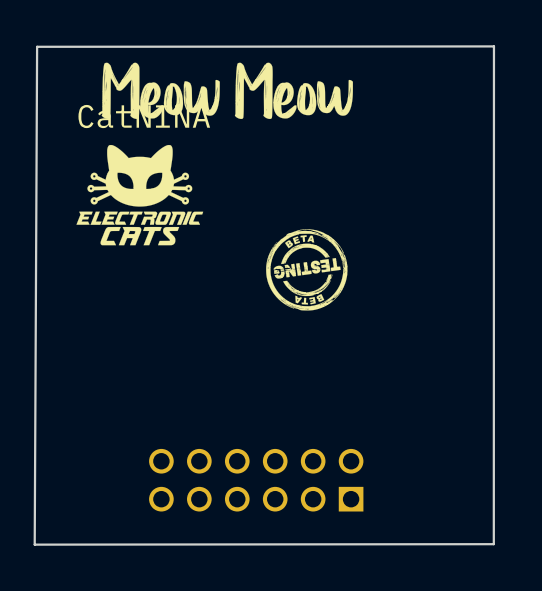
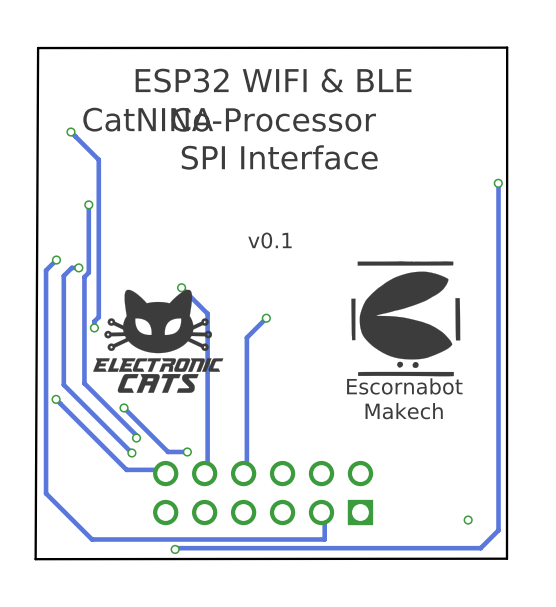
drawing: [101, 62, 353, 120] -> none
text: none -> ESP32 WIFI & BLE (273, 80)
text: none -> Co-Processor (273, 119)
track: none -> (70, 132) (98, 159) (98, 317) (94, 321) (94, 327)
via: none -> (70, 132)
text: none -> SPI Interface (279, 157)
track: none -> (498, 183) (498, 530) (480, 548) (175, 549)
via: none -> (498, 183)
drawing position: (139, 195) -> (158, 341)
track: none -> (88, 204) (88, 272) (84, 277) (84, 383) (136, 435) (136, 438)
via: none -> (88, 204)
drawing: [266, 229, 348, 311] -> none
text: none -> v0.1 (269, 240)
track: none -> (56, 260) (46, 270) (46, 493) (92, 539) (324, 539)
via: none -> (56, 260)
drawing: none -> [351, 261, 461, 377]
track: none -> (78, 267) (71, 267) (63, 275) (63, 384) (131, 452)
via: none -> (78, 267)
track: none -> (181, 287) (207, 313) (207, 482)
via: none -> (181, 287)
track: none -> (266, 318) (246, 337) (246, 464)
via: none -> (266, 318)
via: none -> (94, 327)
text: none -> Escornabot (404, 386)
track: none -> (56, 399) (126, 469) (156, 469) (168, 482)
via: none -> (56, 399)
track: none -> (124, 407) (168, 451) (187, 451)
via: none -> (124, 407)
text: none -> Makech (404, 411)
via: none -> (136, 438)
via: none -> (187, 451)
via: none -> (131, 452)
via: none -> (468, 520)
track: none -> (324, 521) (324, 539)
via: none -> (175, 549)

